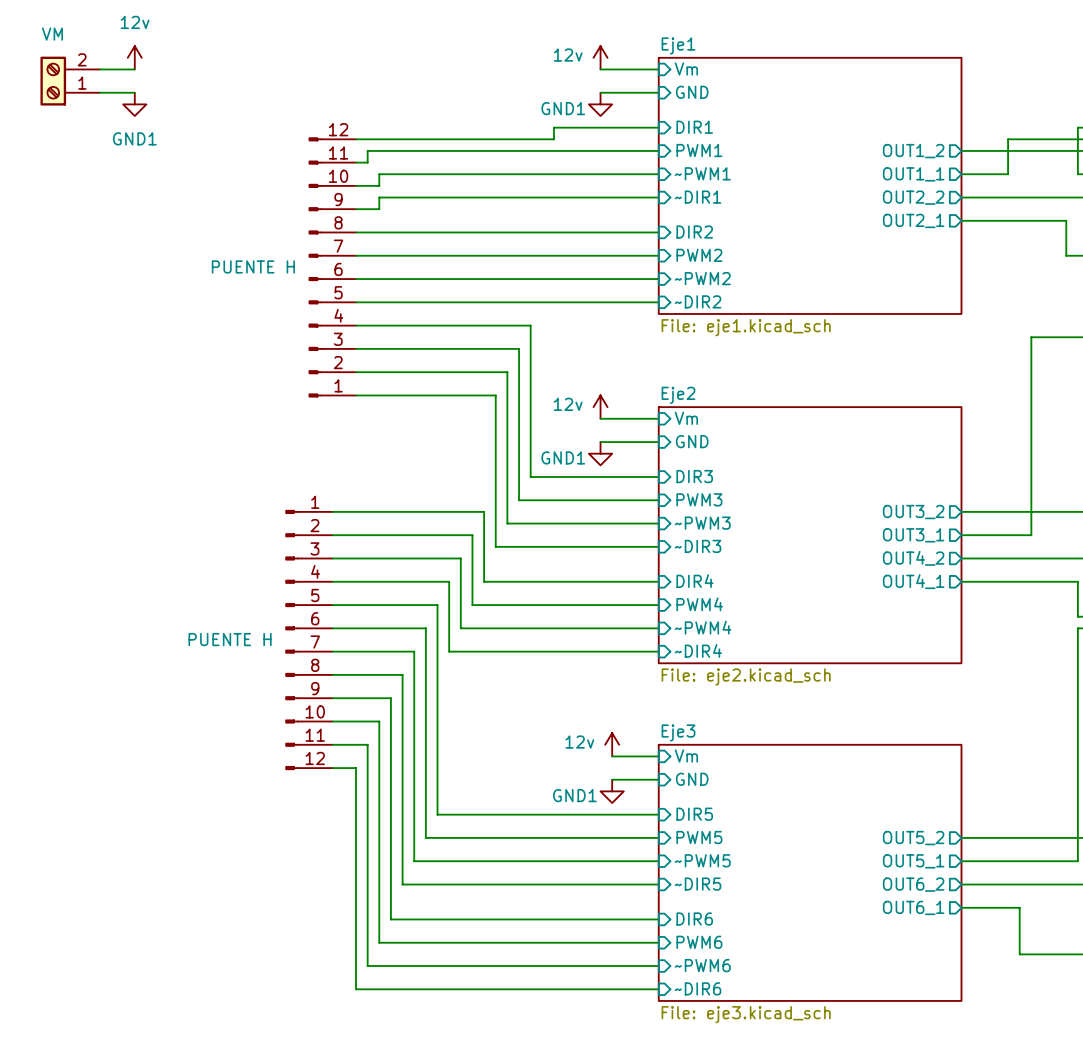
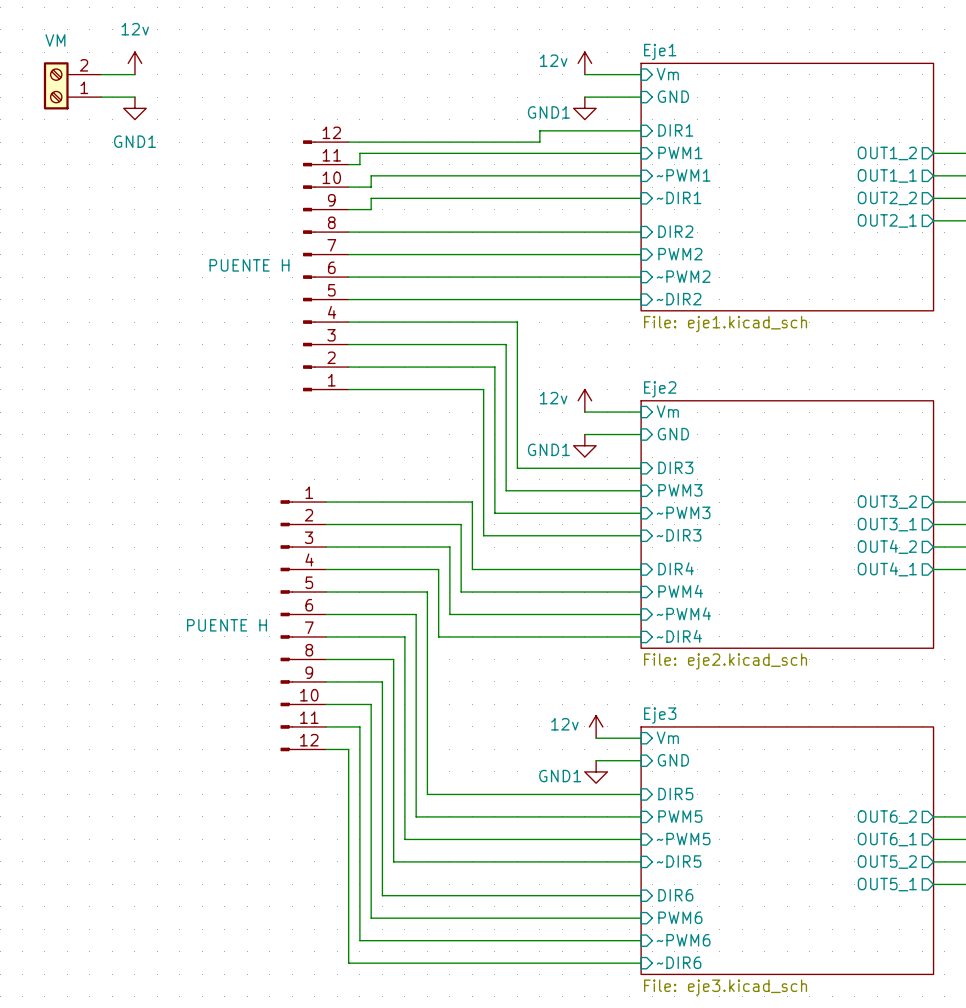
sheet pin: OUT5_2 (913, 838) -> OUT6_2 (887, 817)
sheet pin: OUT5_1 (913, 861) -> OUT6_1 (887, 839)
sheet pin: OUT6_2 (913, 884) -> OUT5_2 (887, 862)
sheet pin: OUT6_1 (913, 907) -> OUT5_1 (887, 884)

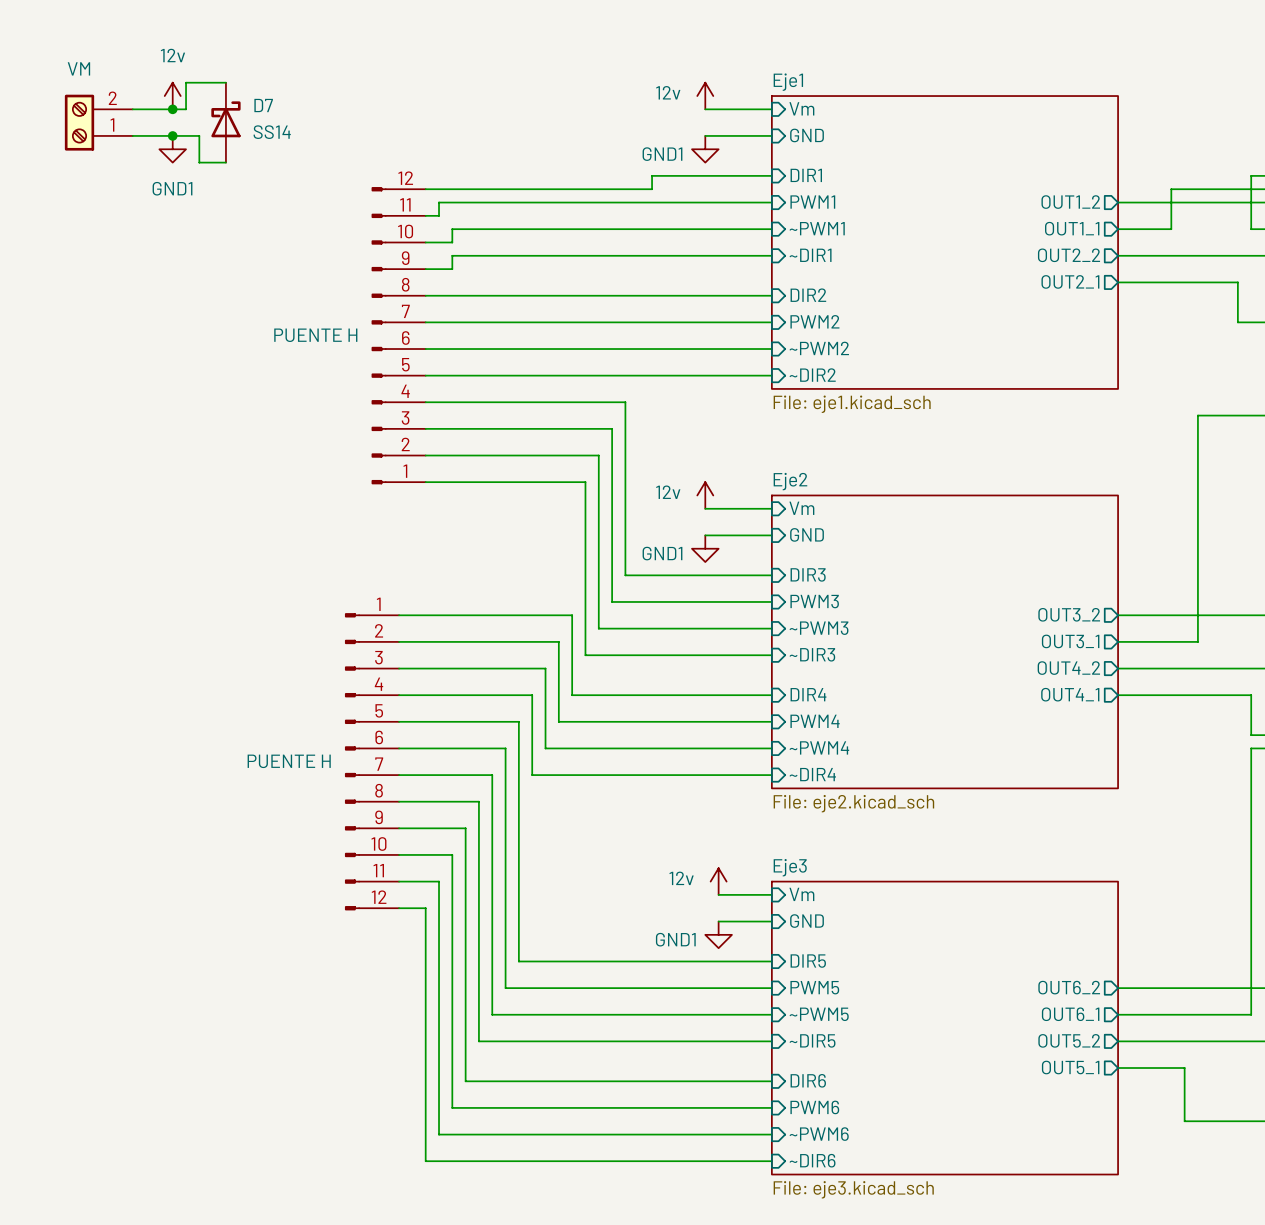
wire: none -> (225, 82) (186, 82) (186, 109) (172, 109)
junction: none -> (172, 109)
D7: none -> SS14 (225, 122)
wire: none -> (172, 135) (199, 135) (199, 162) (225, 162)
junction: none -> (172, 135)

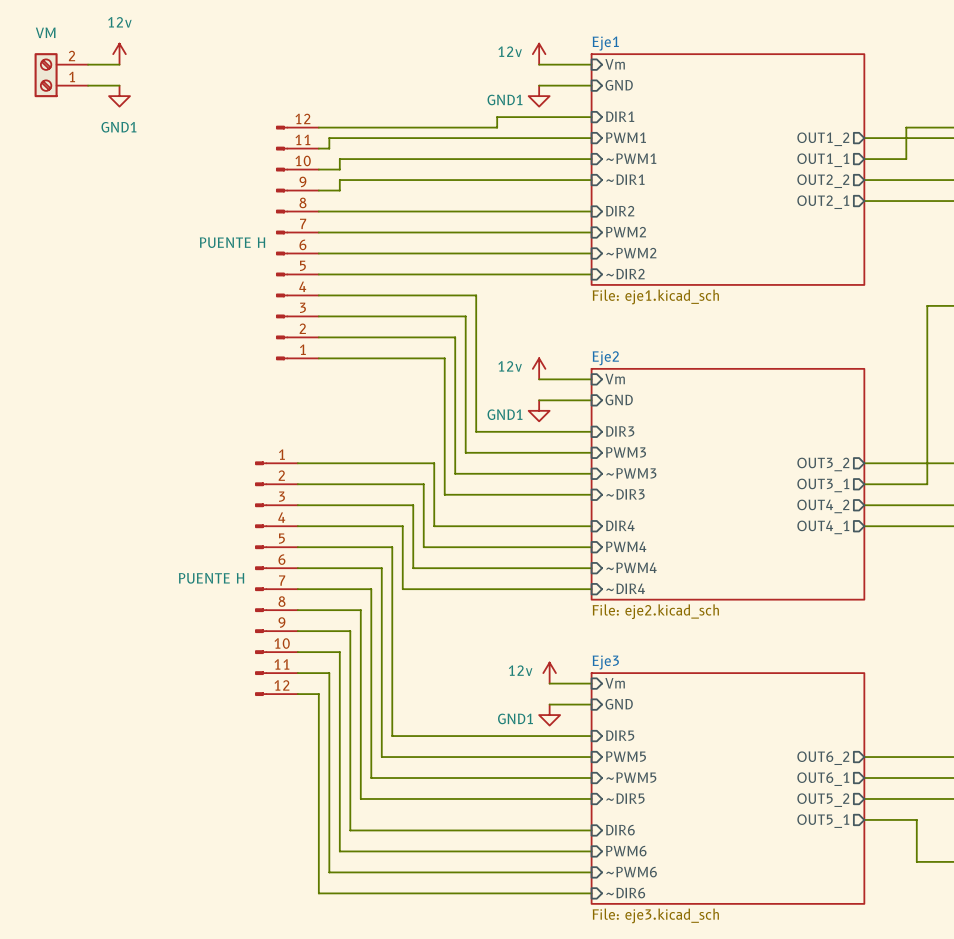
wire: (225, 82) (186, 82) (186, 109) (172, 109) -> none
junction: (172, 109) -> none
D7: SS14 (225, 122) -> none
wire: (172, 135) (199, 135) (199, 162) (225, 162) -> none
junction: (172, 135) -> none

